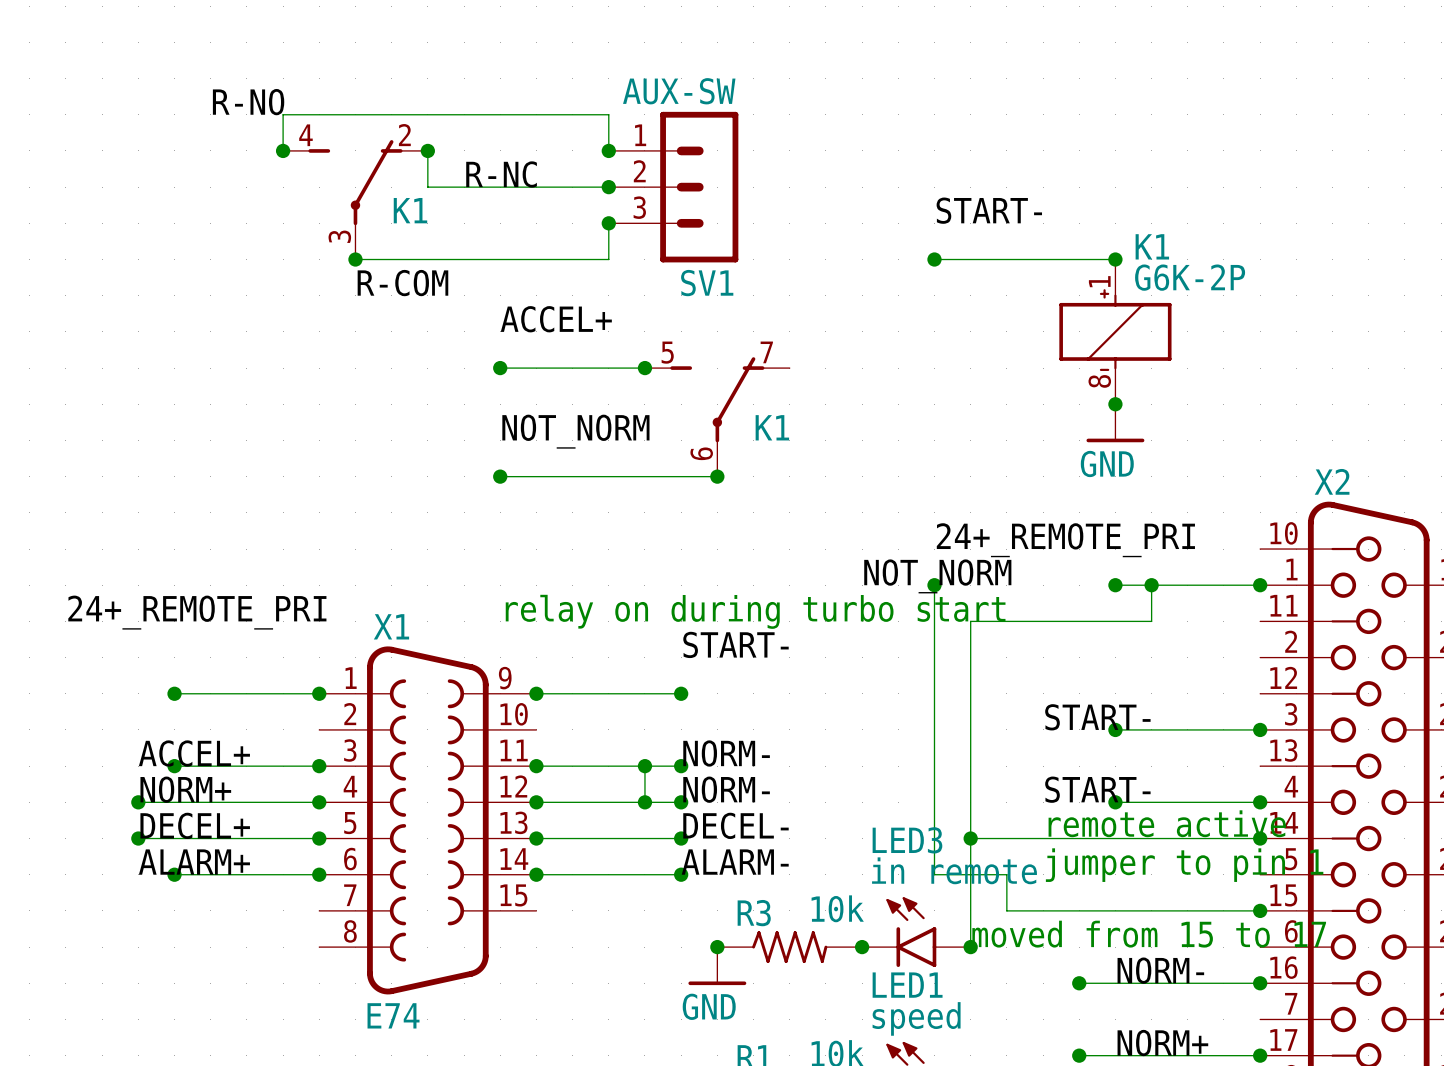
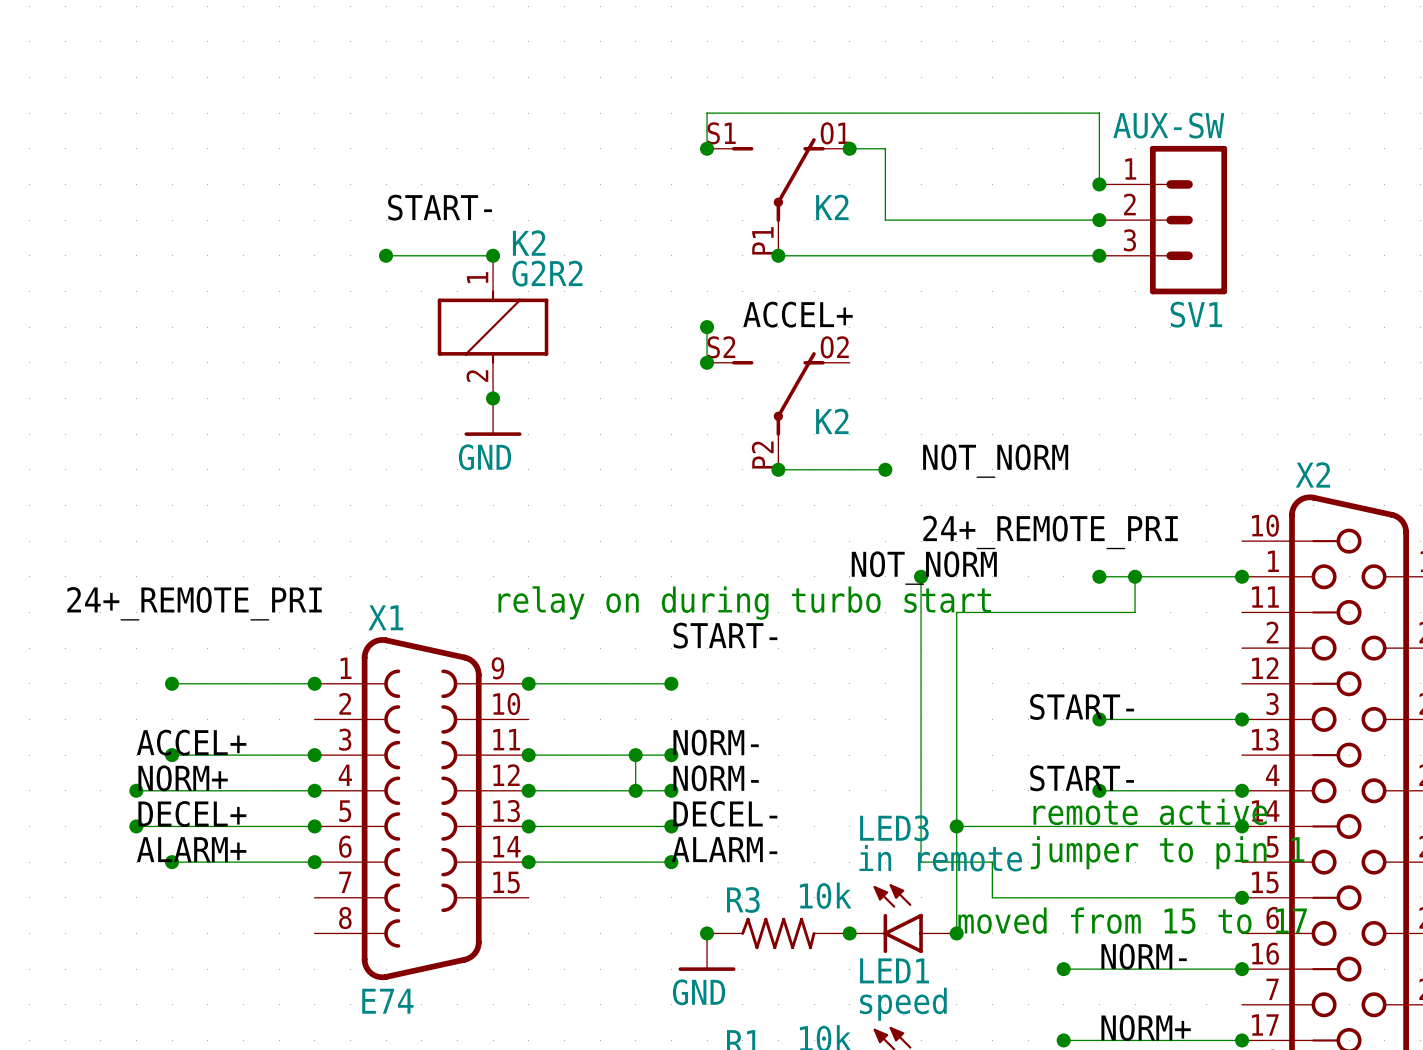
label: R-NO (248, 102) -> none
wire: (283, 150) (283, 114) (608, 114) (608, 150) -> none
junction: (283, 150) -> none
wire: (427, 150) (427, 187) (608, 187) -> none
junction: (427, 150) -> none
junction: (608, 150) -> none
wire: none -> (707, 148) (707, 113) (1099, 113) (1099, 184)
junction: none -> (707, 148)
wire: none -> (849, 148) (885, 148) (885, 220) (1099, 220)
junction: none -> (849, 148)
label: R-NC (501, 174) -> none
junction: (608, 187) -> none
SV1 position: (673, 187) -> (1163, 220)
junction: none -> (1099, 184)
K1: (355, 199) -> none
K2: none -> (778, 196)
label: none -> START- (440, 207)
label: START- (989, 210) -> none
wire: (608, 223) (608, 259) (500, 259) -> none
junction: (608, 223) -> none
junction: none -> (1099, 220)
wire: (355, 259) (391, 259) -> none
junction position: (355, 259) -> (386, 255)
junction: none -> (493, 255)
junction: none -> (778, 255)
junction: (934, 259) -> none
label: R-COM (402, 283) -> none
label position: ACCEL+ (556, 319) -> ACCEL+ (797, 314)
K2: none -> G2R2 (493, 327)
wire: none -> (707, 327) (707, 362)
junction: none -> (707, 327)
K1: G6K-2P (1115, 331) -> none
wire: (500, 368) (644, 368) -> (778, 255) (921, 255)
junction: (500, 368) -> none
junction: (644, 368) -> none
junction: none -> (707, 362)
junction: none -> (493, 398)
junction: (1115, 404) -> none
K1: (717, 416) -> none
K2: none -> (778, 410)
power symbol: none -> GND (493, 417)
power symbol: GND (1115, 423) -> none
label: NOT_NORM (575, 431) -> none
label: none -> NOT_NORM (995, 461)
wire: (500, 476) (717, 476) -> none
junction: (500, 476) -> none
junction: (717, 476) -> none
wire: none -> (778, 469) (885, 469)
junction: none -> (778, 469)
junction: none -> (885, 469)

